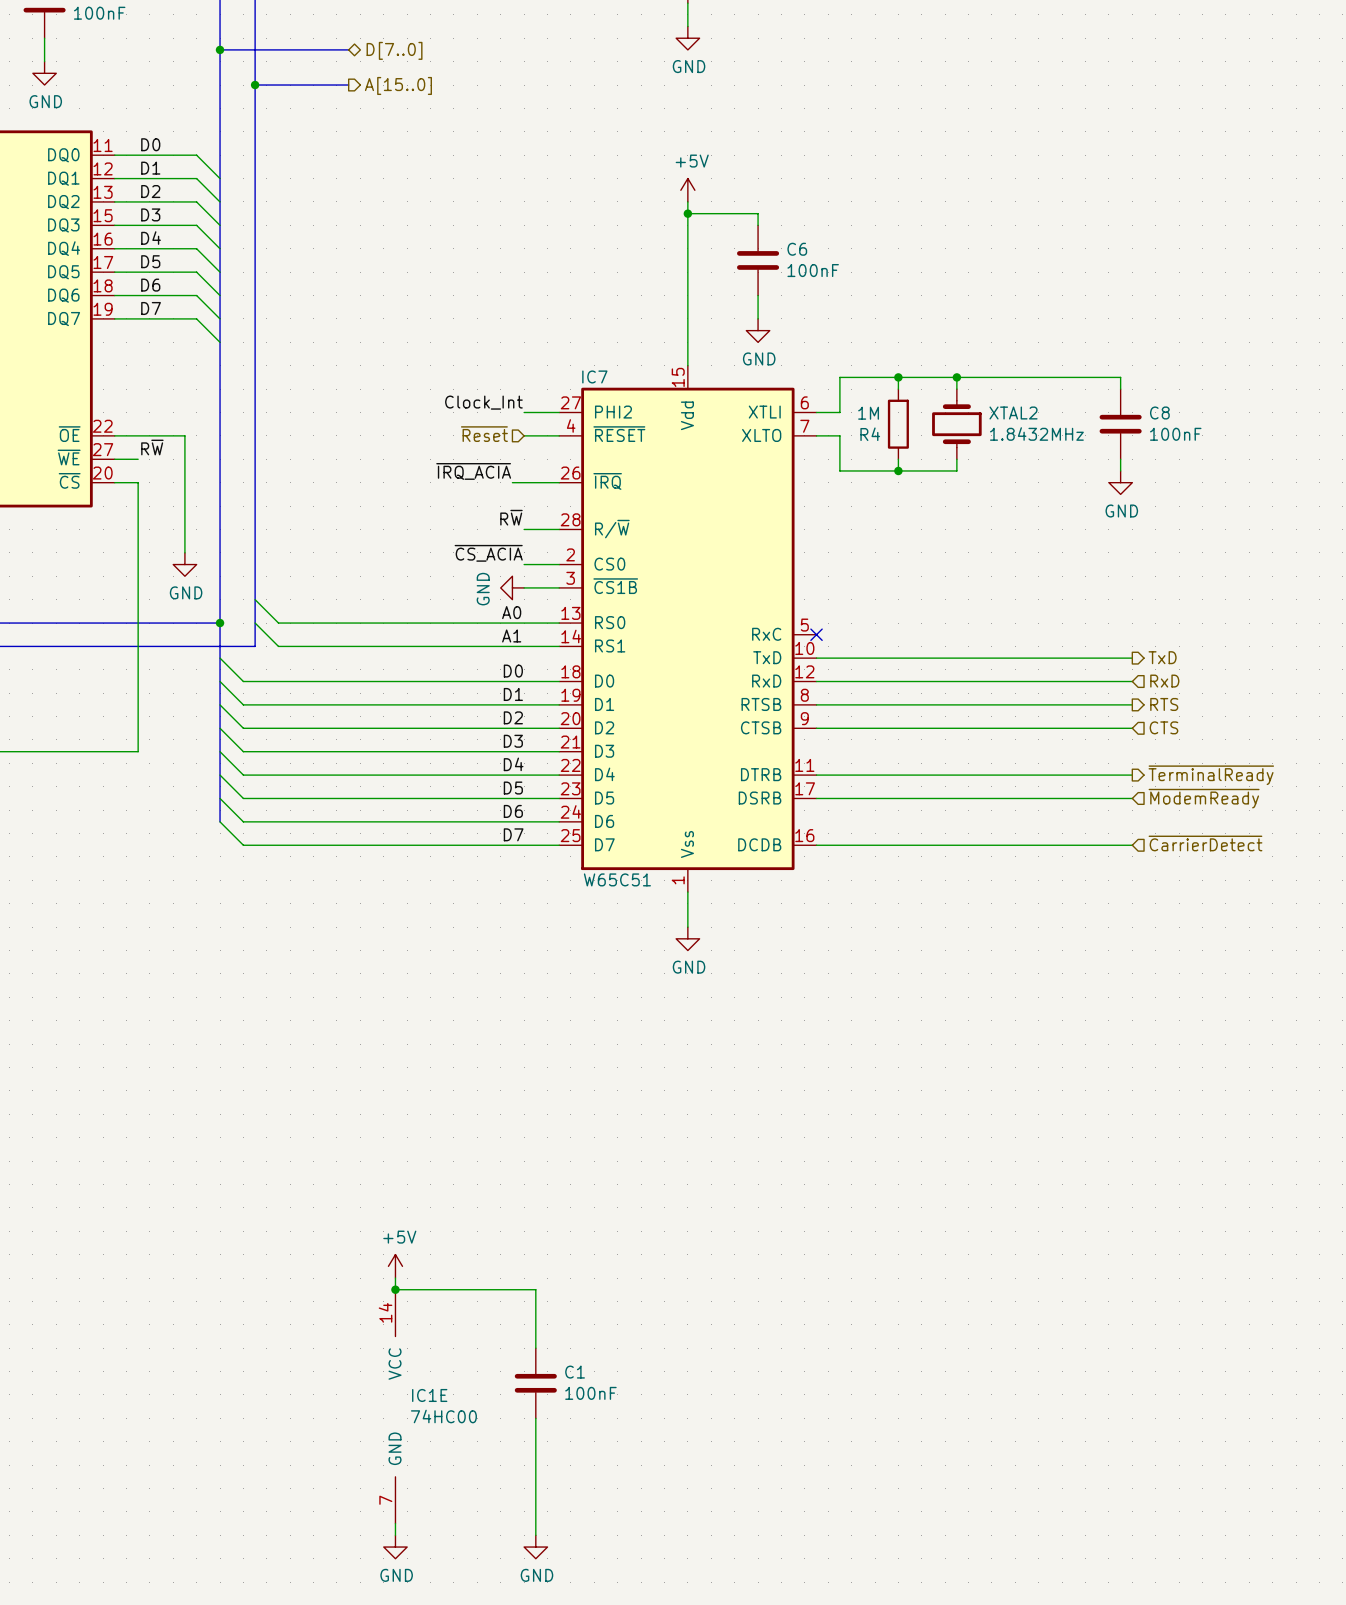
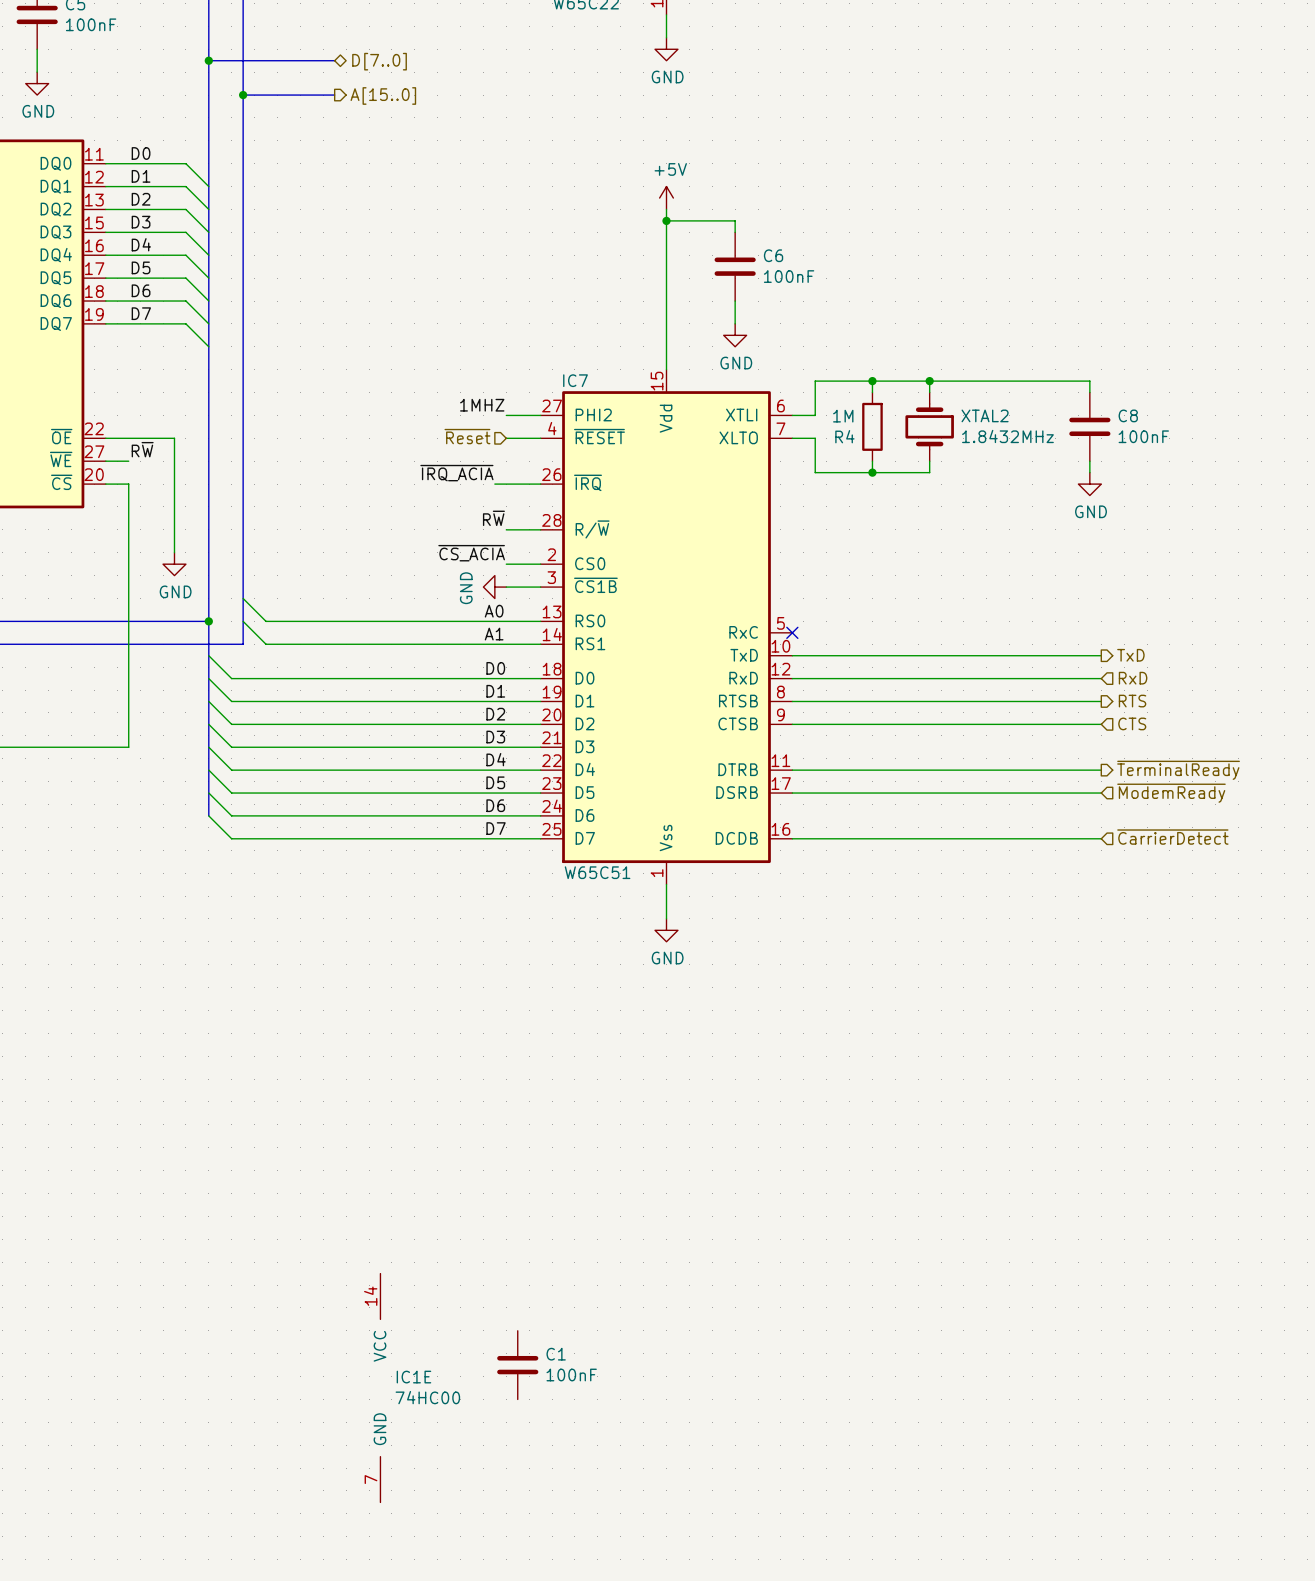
label: Clock_Int (483, 402) -> 1MHZ (482, 405)
power symbol: +5V (395, 1266) -> none
wire: (395, 1278) (395, 1289) (535, 1289) (535, 1348) -> none
junction: (395, 1289) -> none
wire: (535, 1418) (535, 1535) -> none
wire: (395, 1523) (395, 1535) -> none
power symbol: GND (395, 1547) -> none
power symbol: GND (535, 1547) -> none

